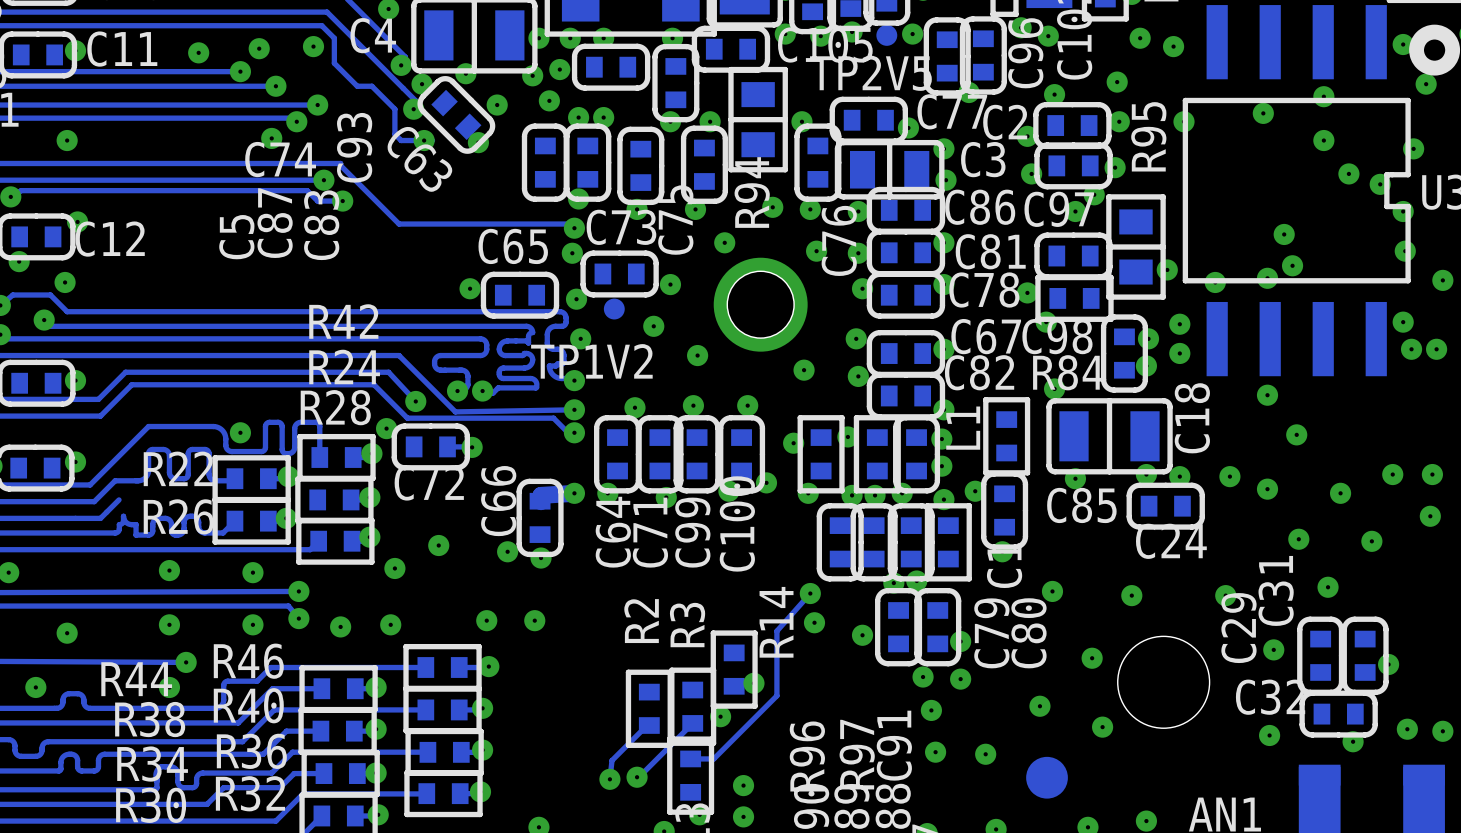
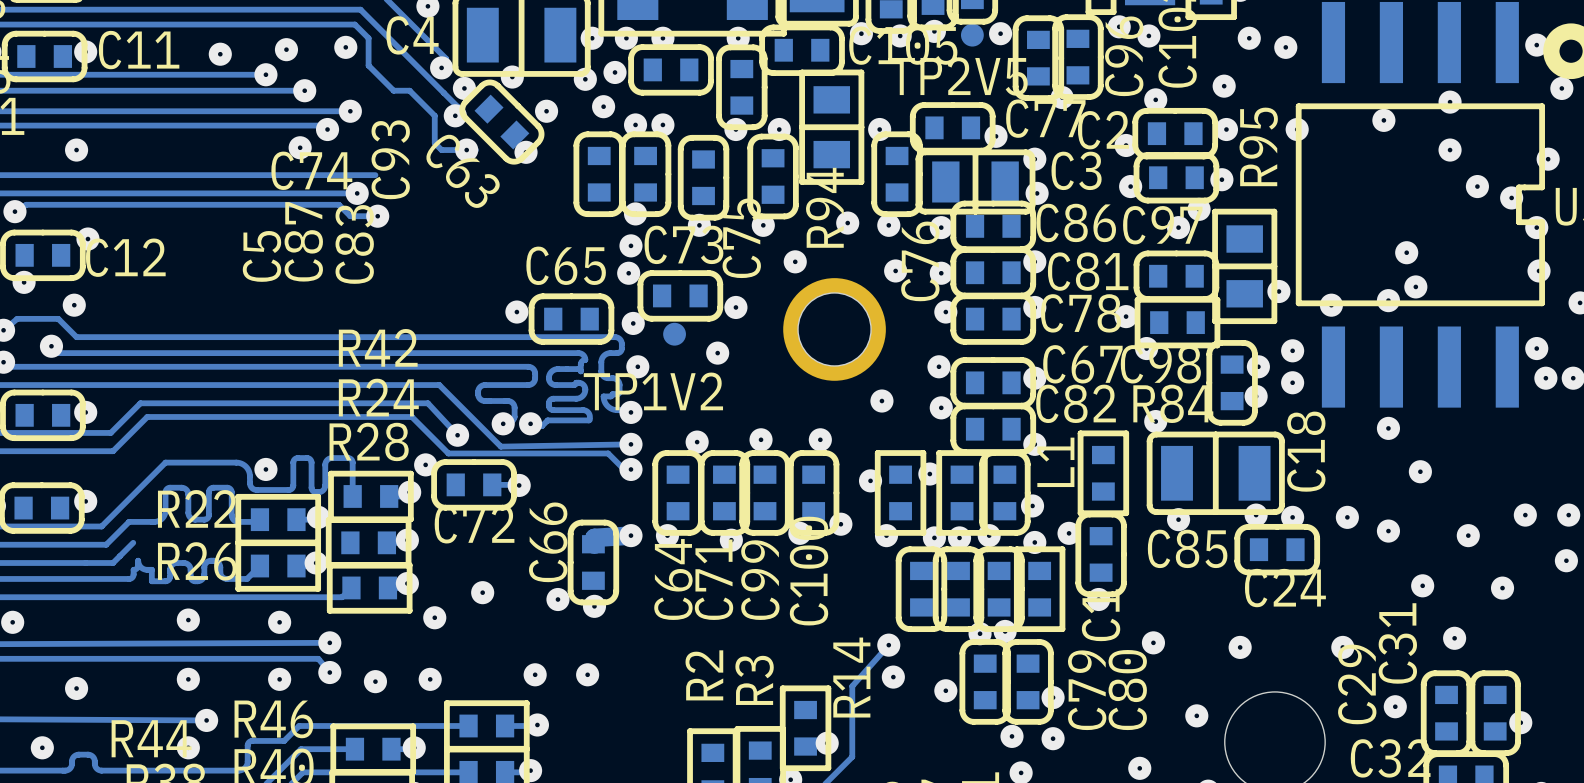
track: (340, 163) (399, 224) (572, 224) (580, 232) -> none
via: (697, 355) -> none
via: (941, 439) -> none

